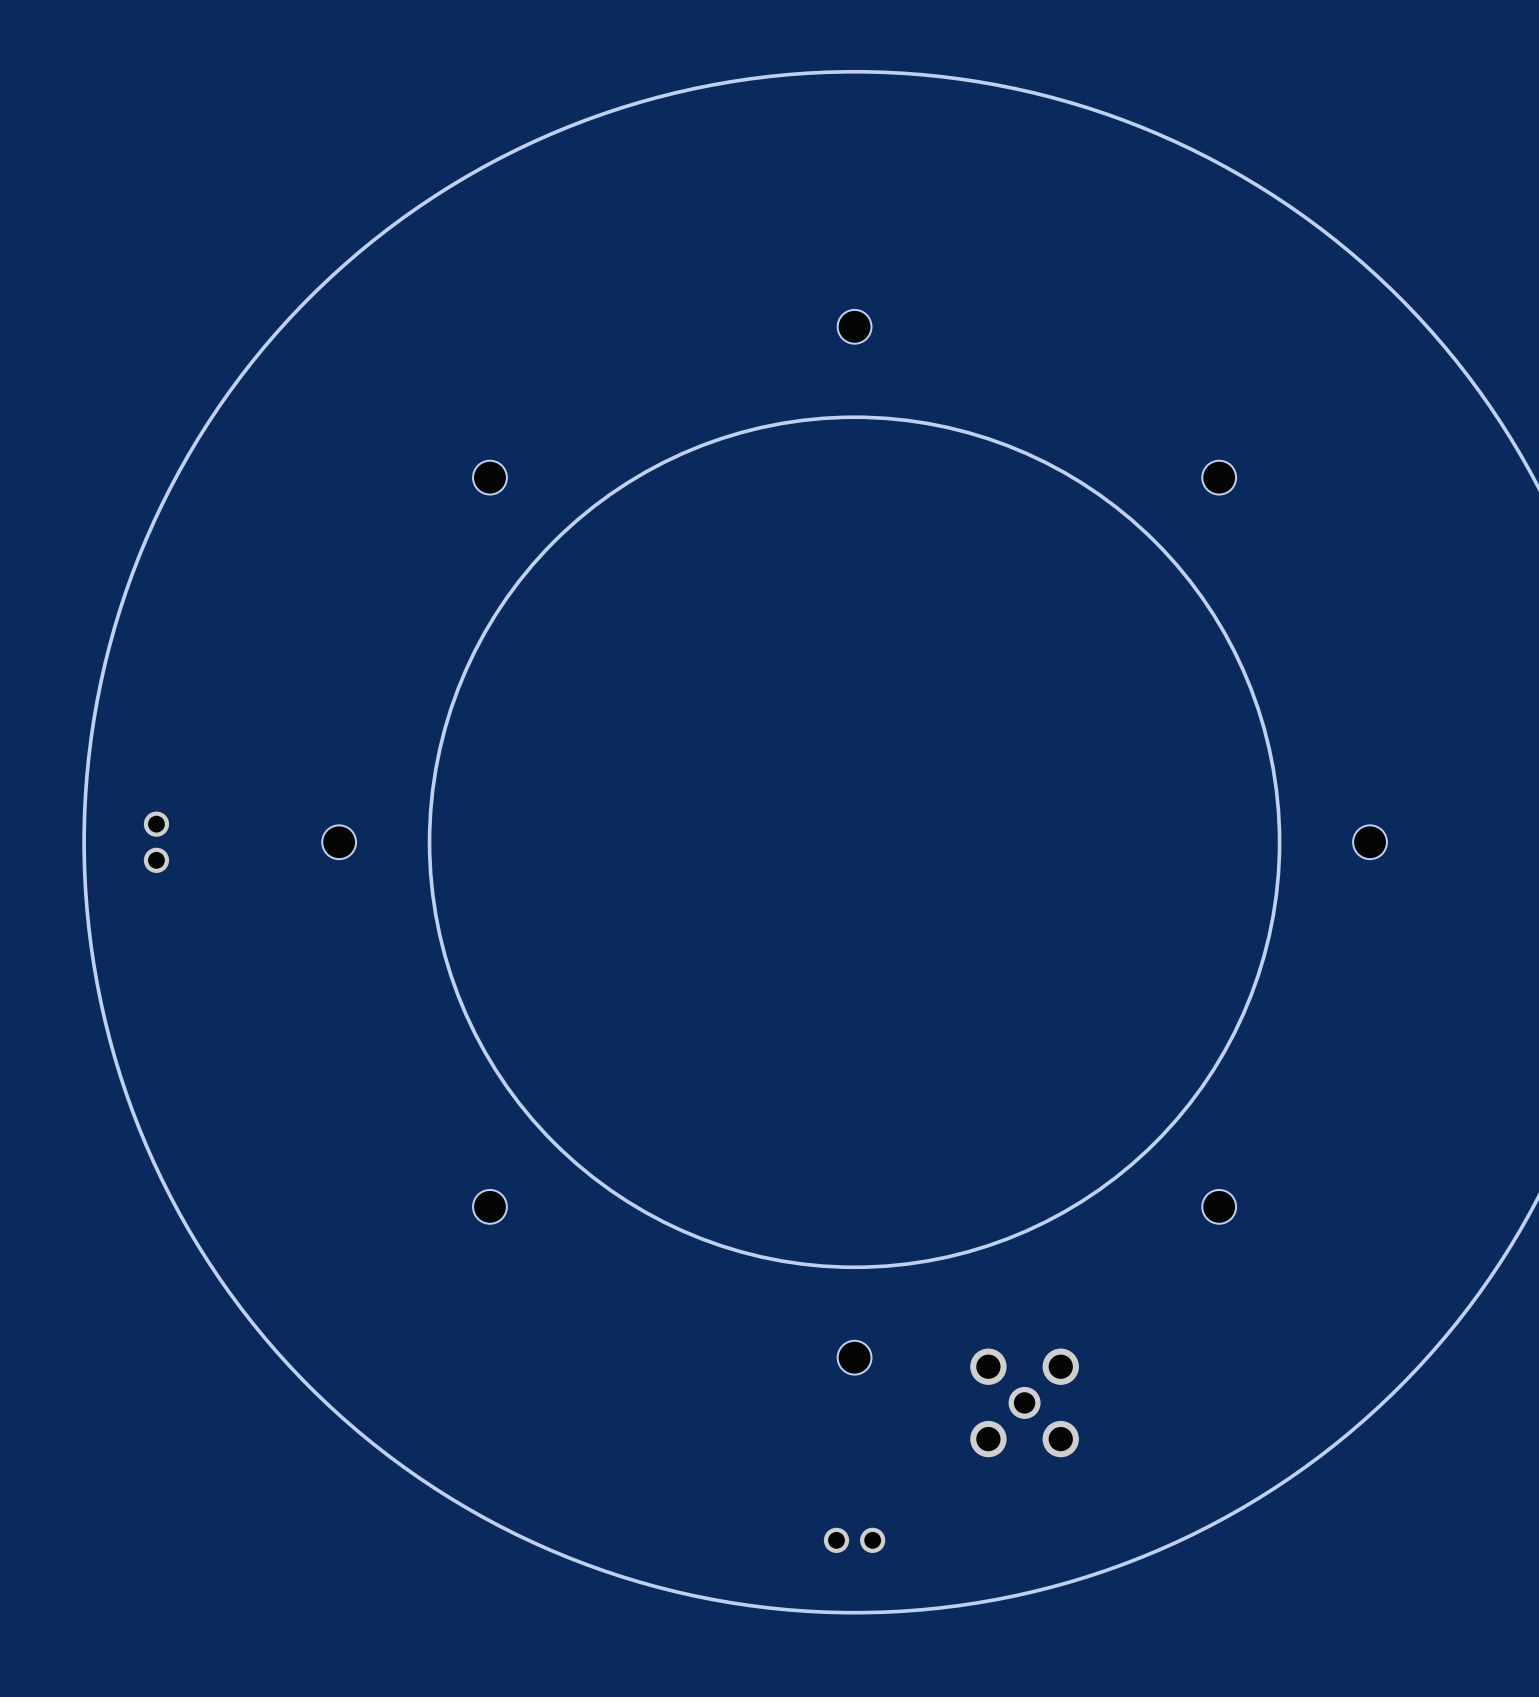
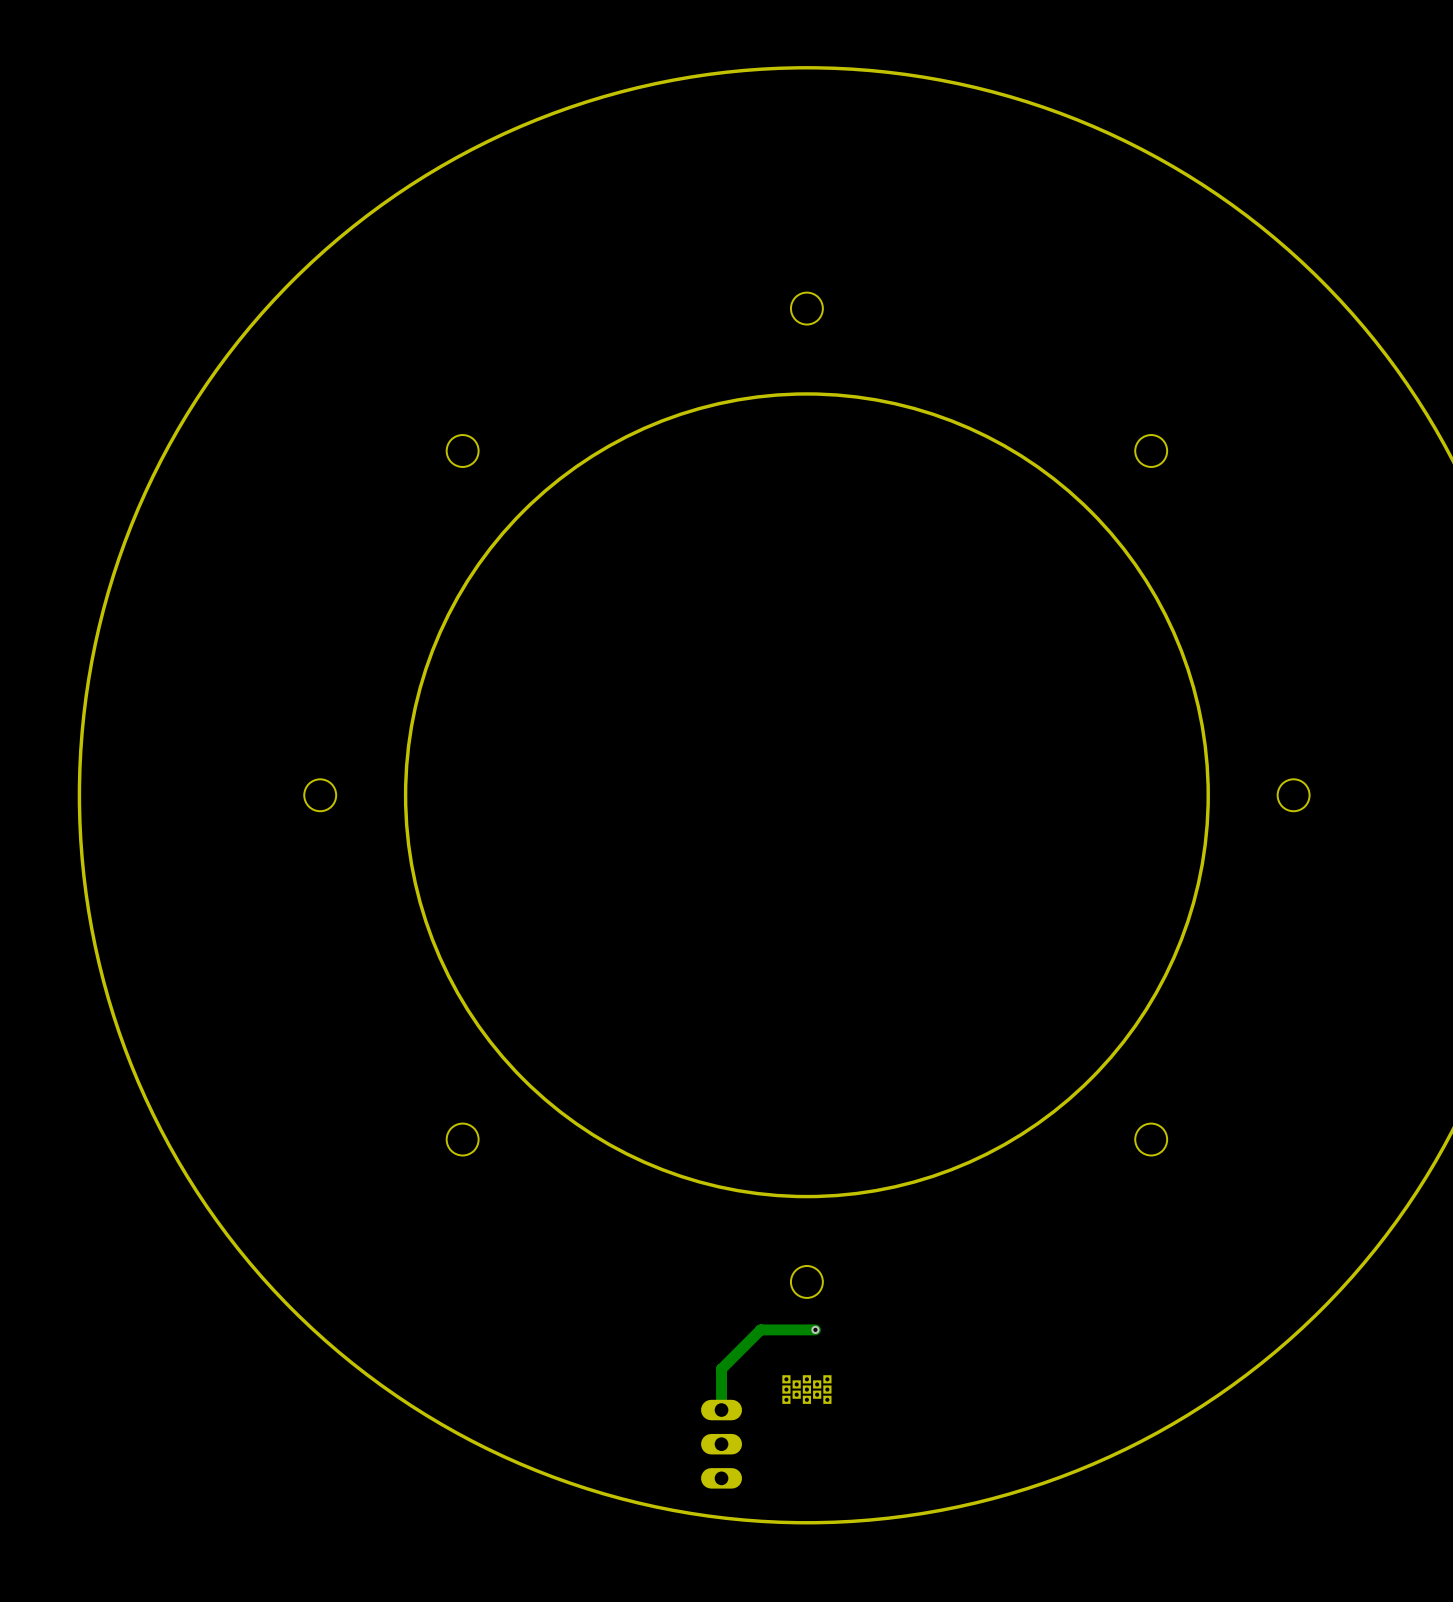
part: (156, 842) -> none
part: (1024, 1402) -> none
track: none -> (815, 1329) (760, 1329) (721, 1369) (721, 1410)
via: none -> (815, 1329)
part: none -> (806, 1389)
part: none -> (721, 1444)
part: (854, 1540) -> none

